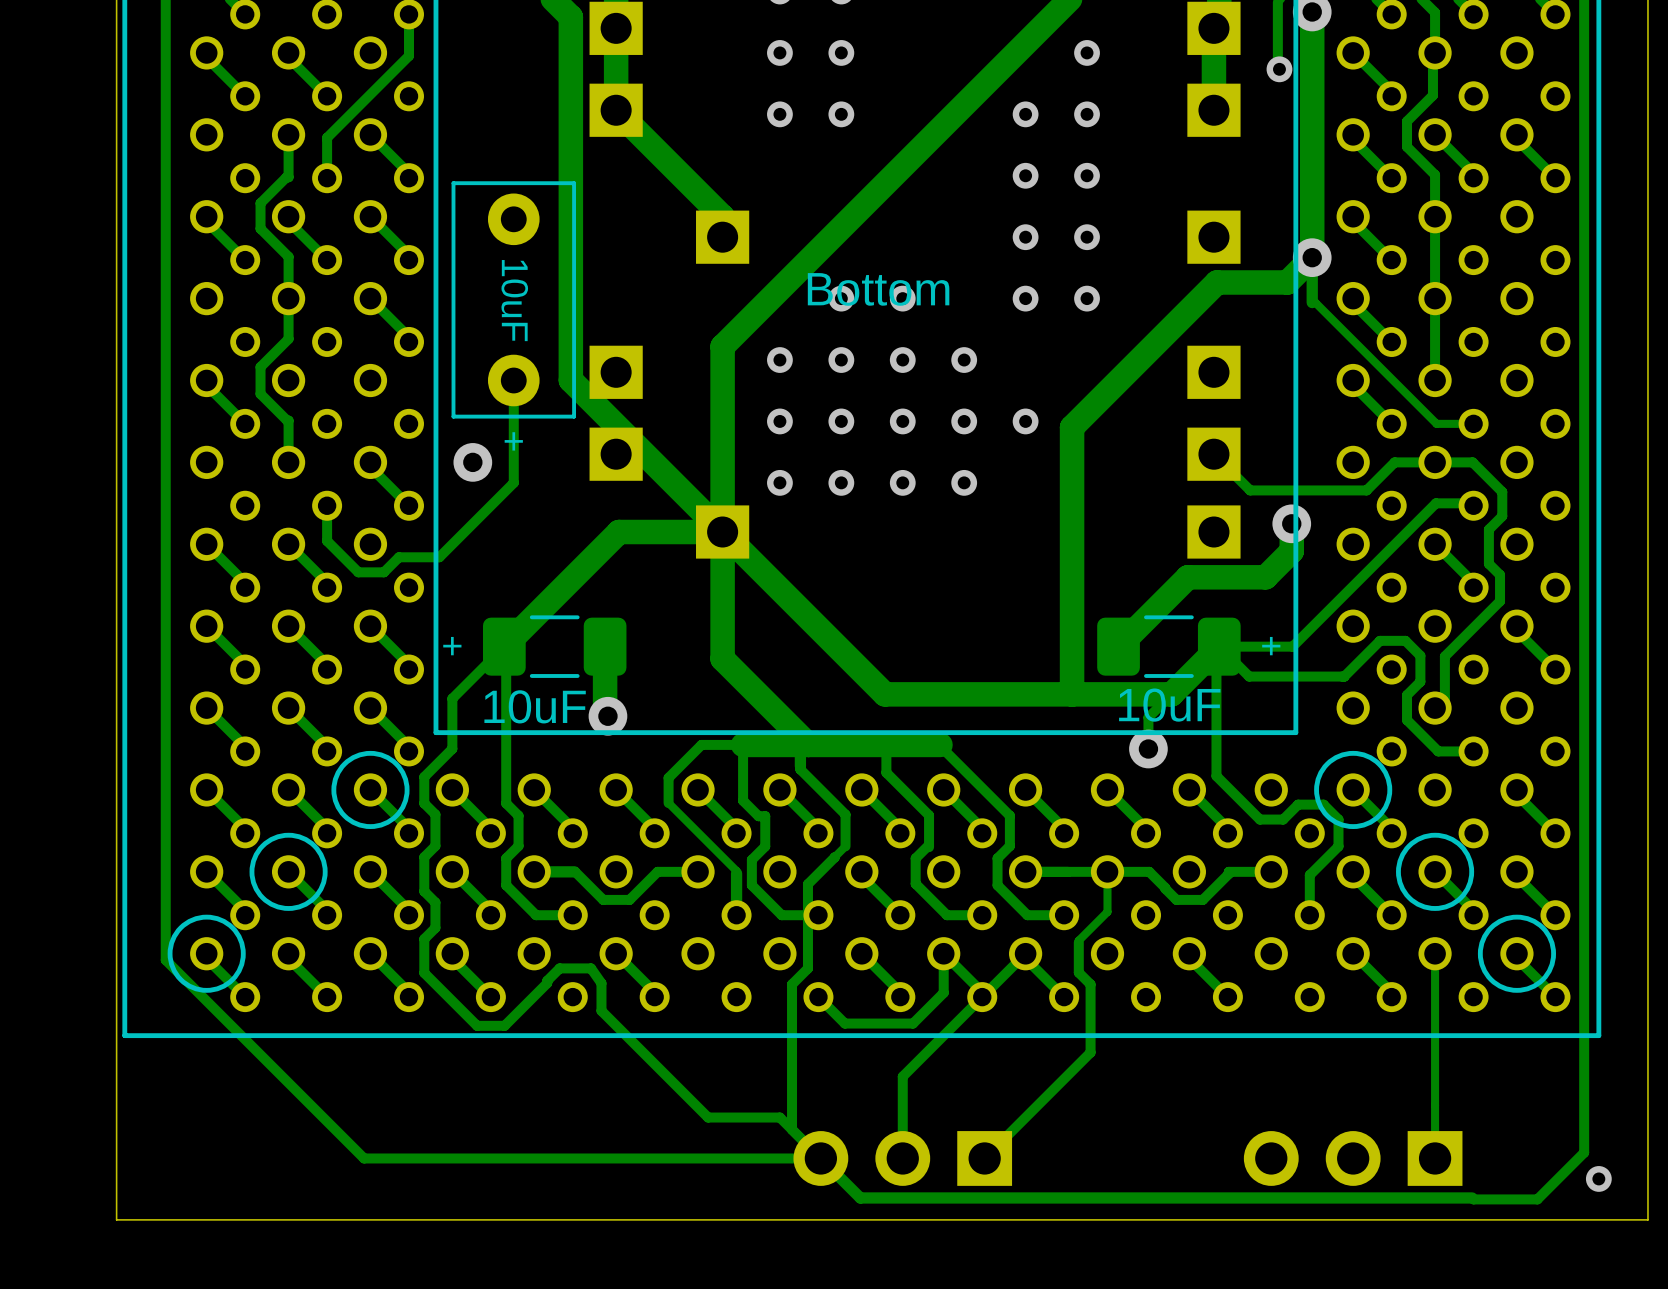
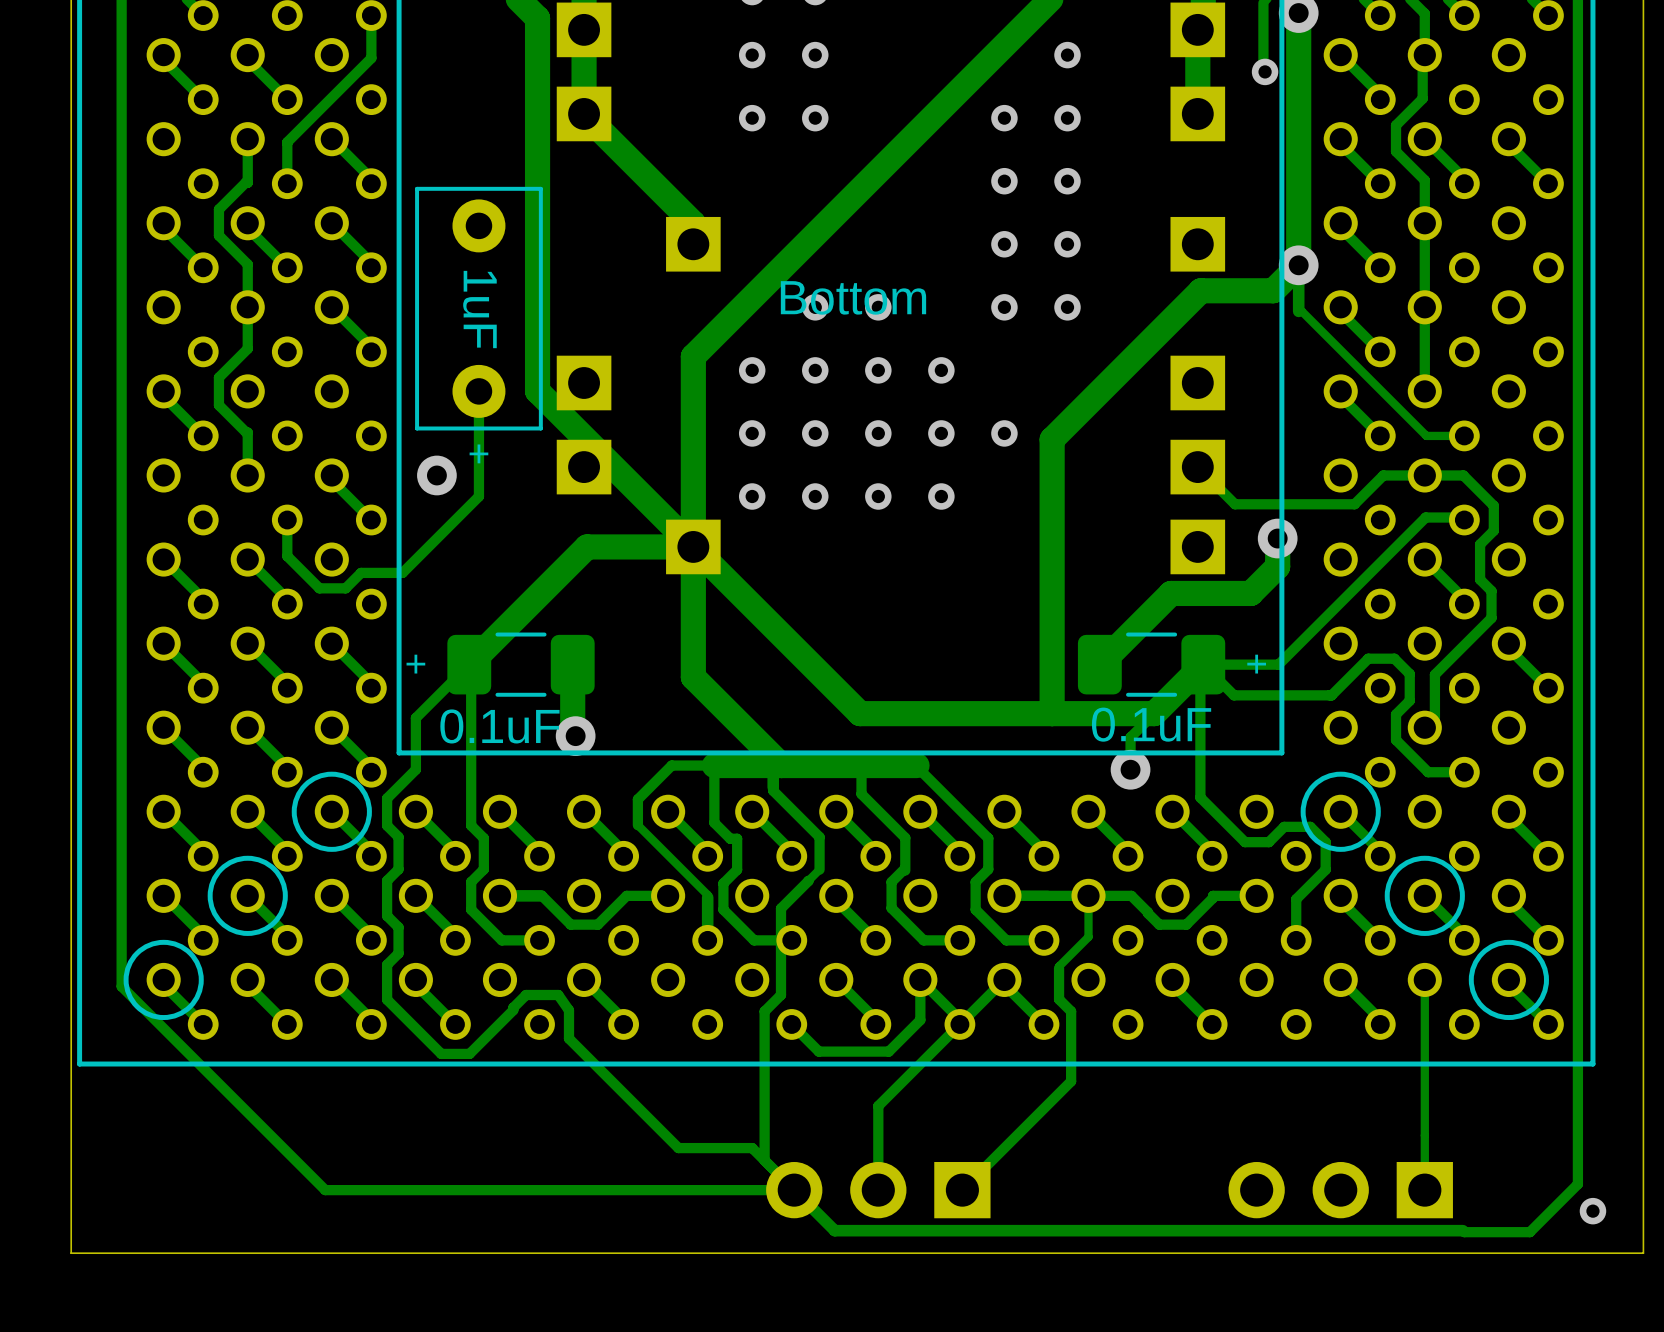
10uF name: 10uF (514, 300) -> 1uF (479, 309)
10uF name: 10uF (1169, 705) -> 0.1uF (1151, 724)
10uF name: 10uF (535, 706) -> 0.1uF (499, 726)

